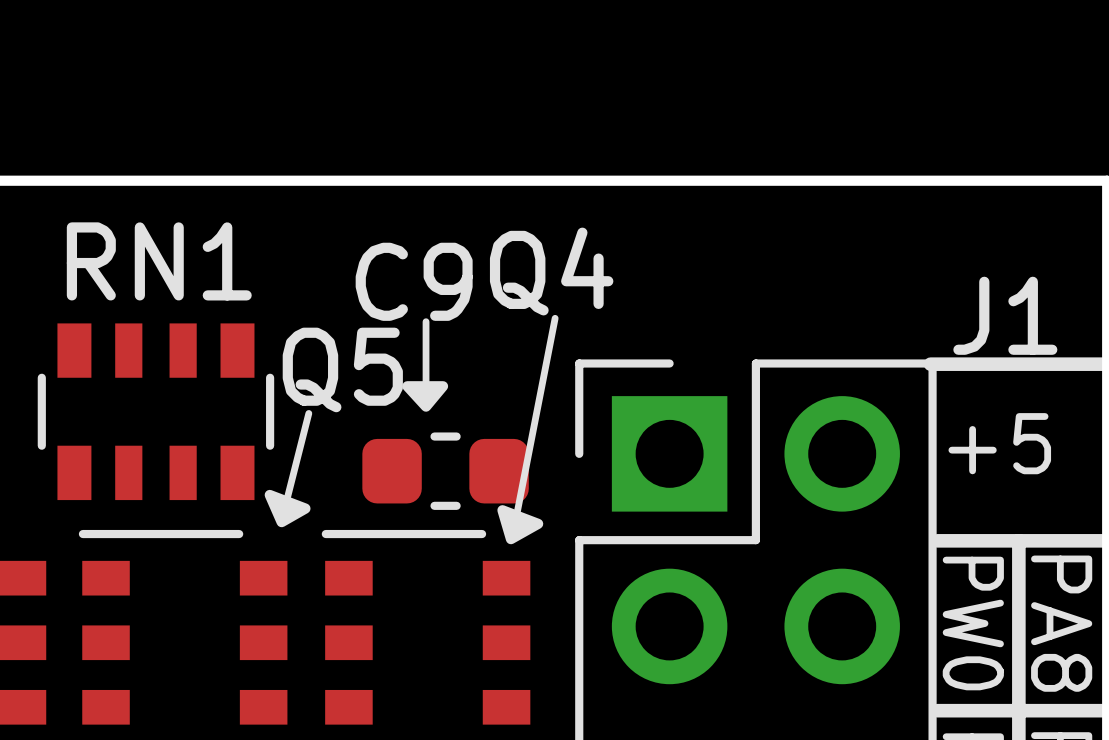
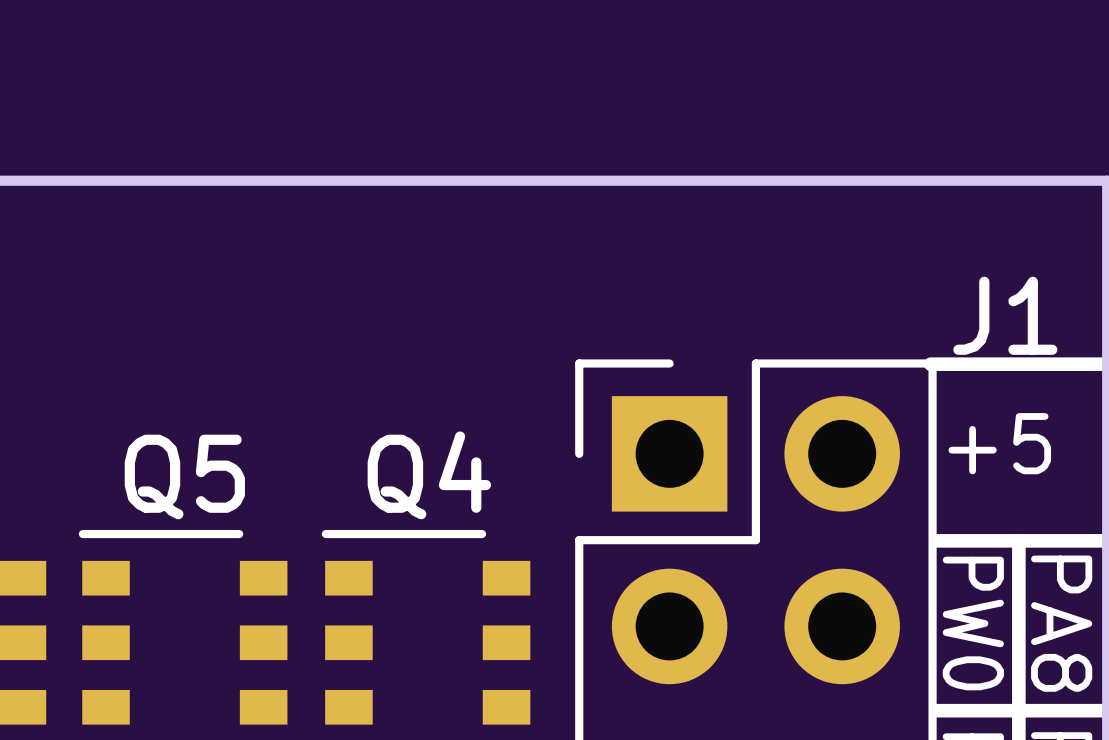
Q4 name position: Q4 (551, 271) -> Q4 (429, 475)
line: (555, 318) (512, 535) -> none
line: (426, 321) (426, 406) -> none
Q5 name position: Q5 (342, 369) -> Q5 (184, 476)
drawing: [402, 381, 449, 412] -> none
RN1: (155, 411) -> none
line: (308, 413) (281, 520) -> none
C9: (445, 471) -> none
drawing: [264, 489, 311, 528] -> none
drawing: [497, 505, 544, 545] -> none

